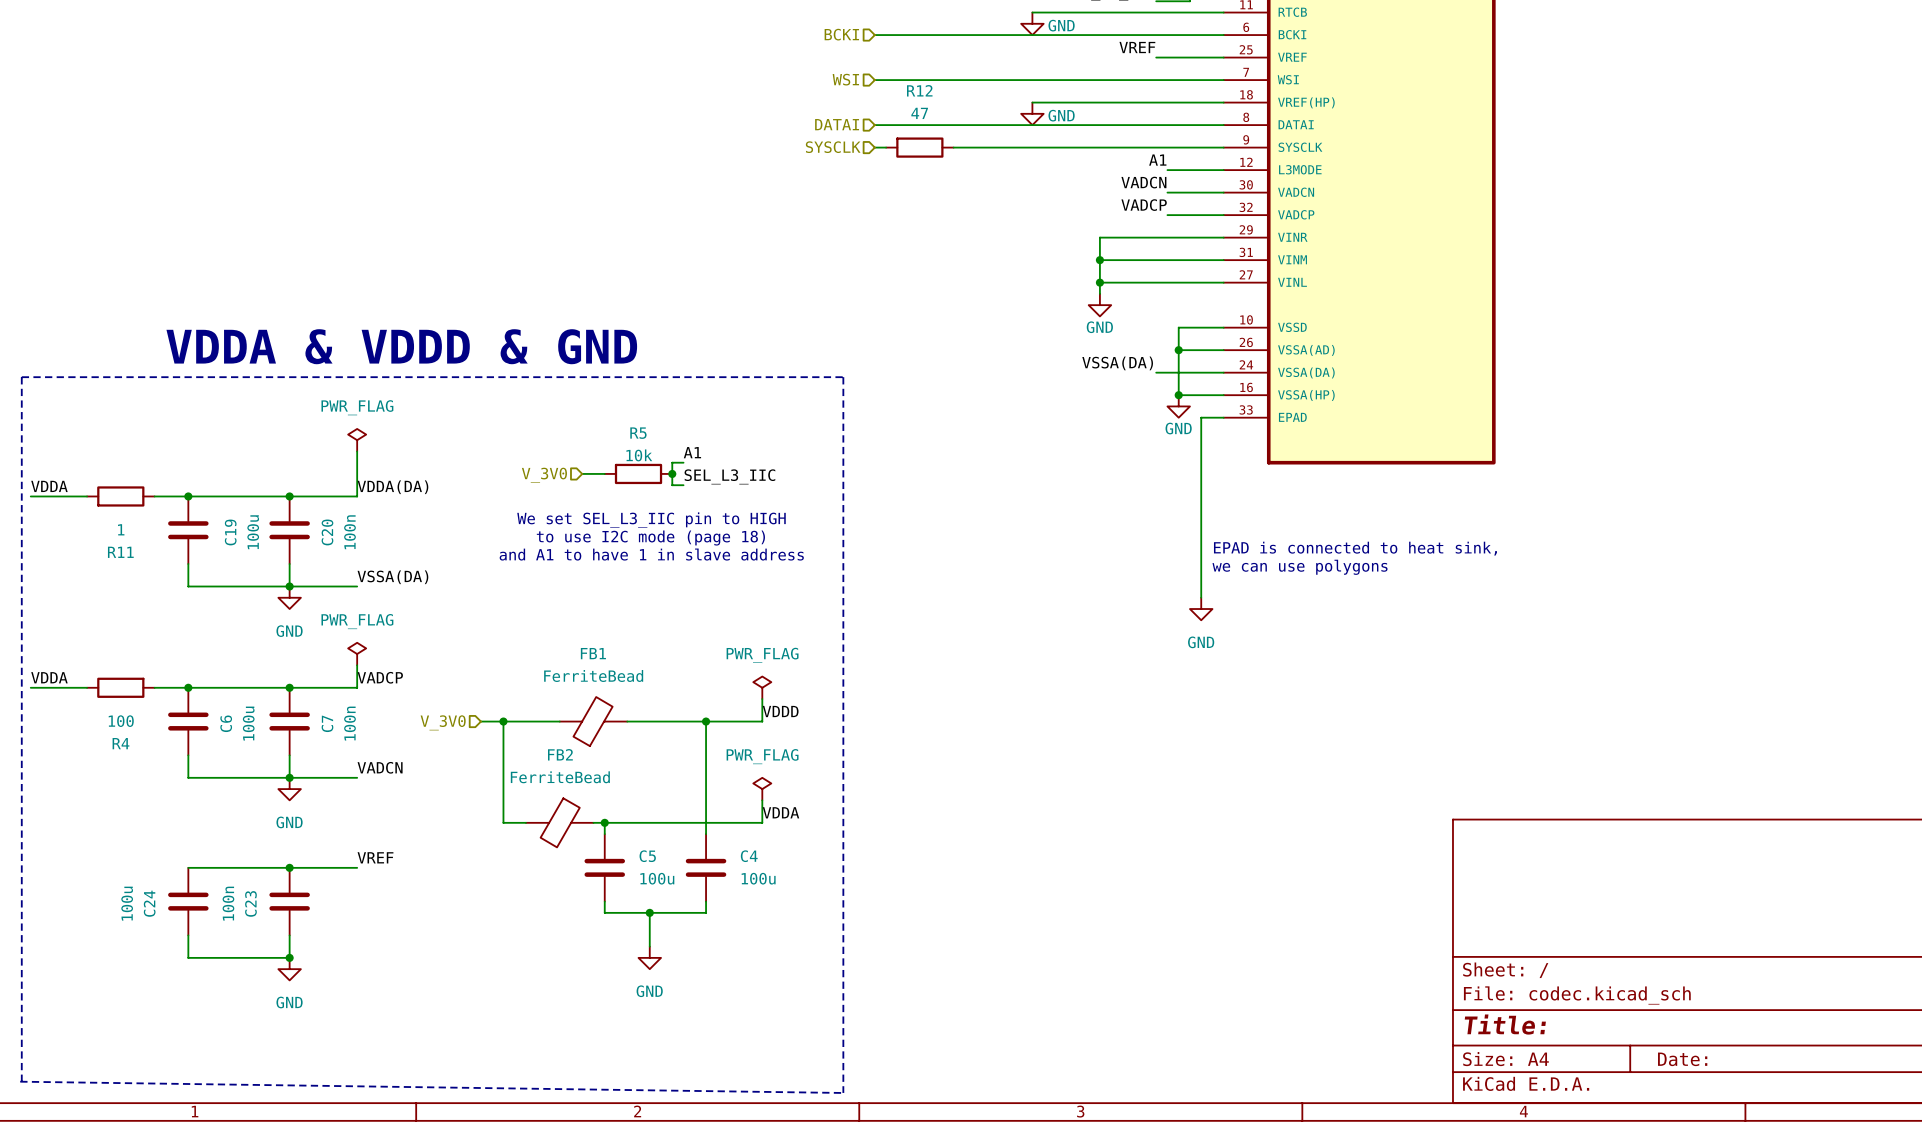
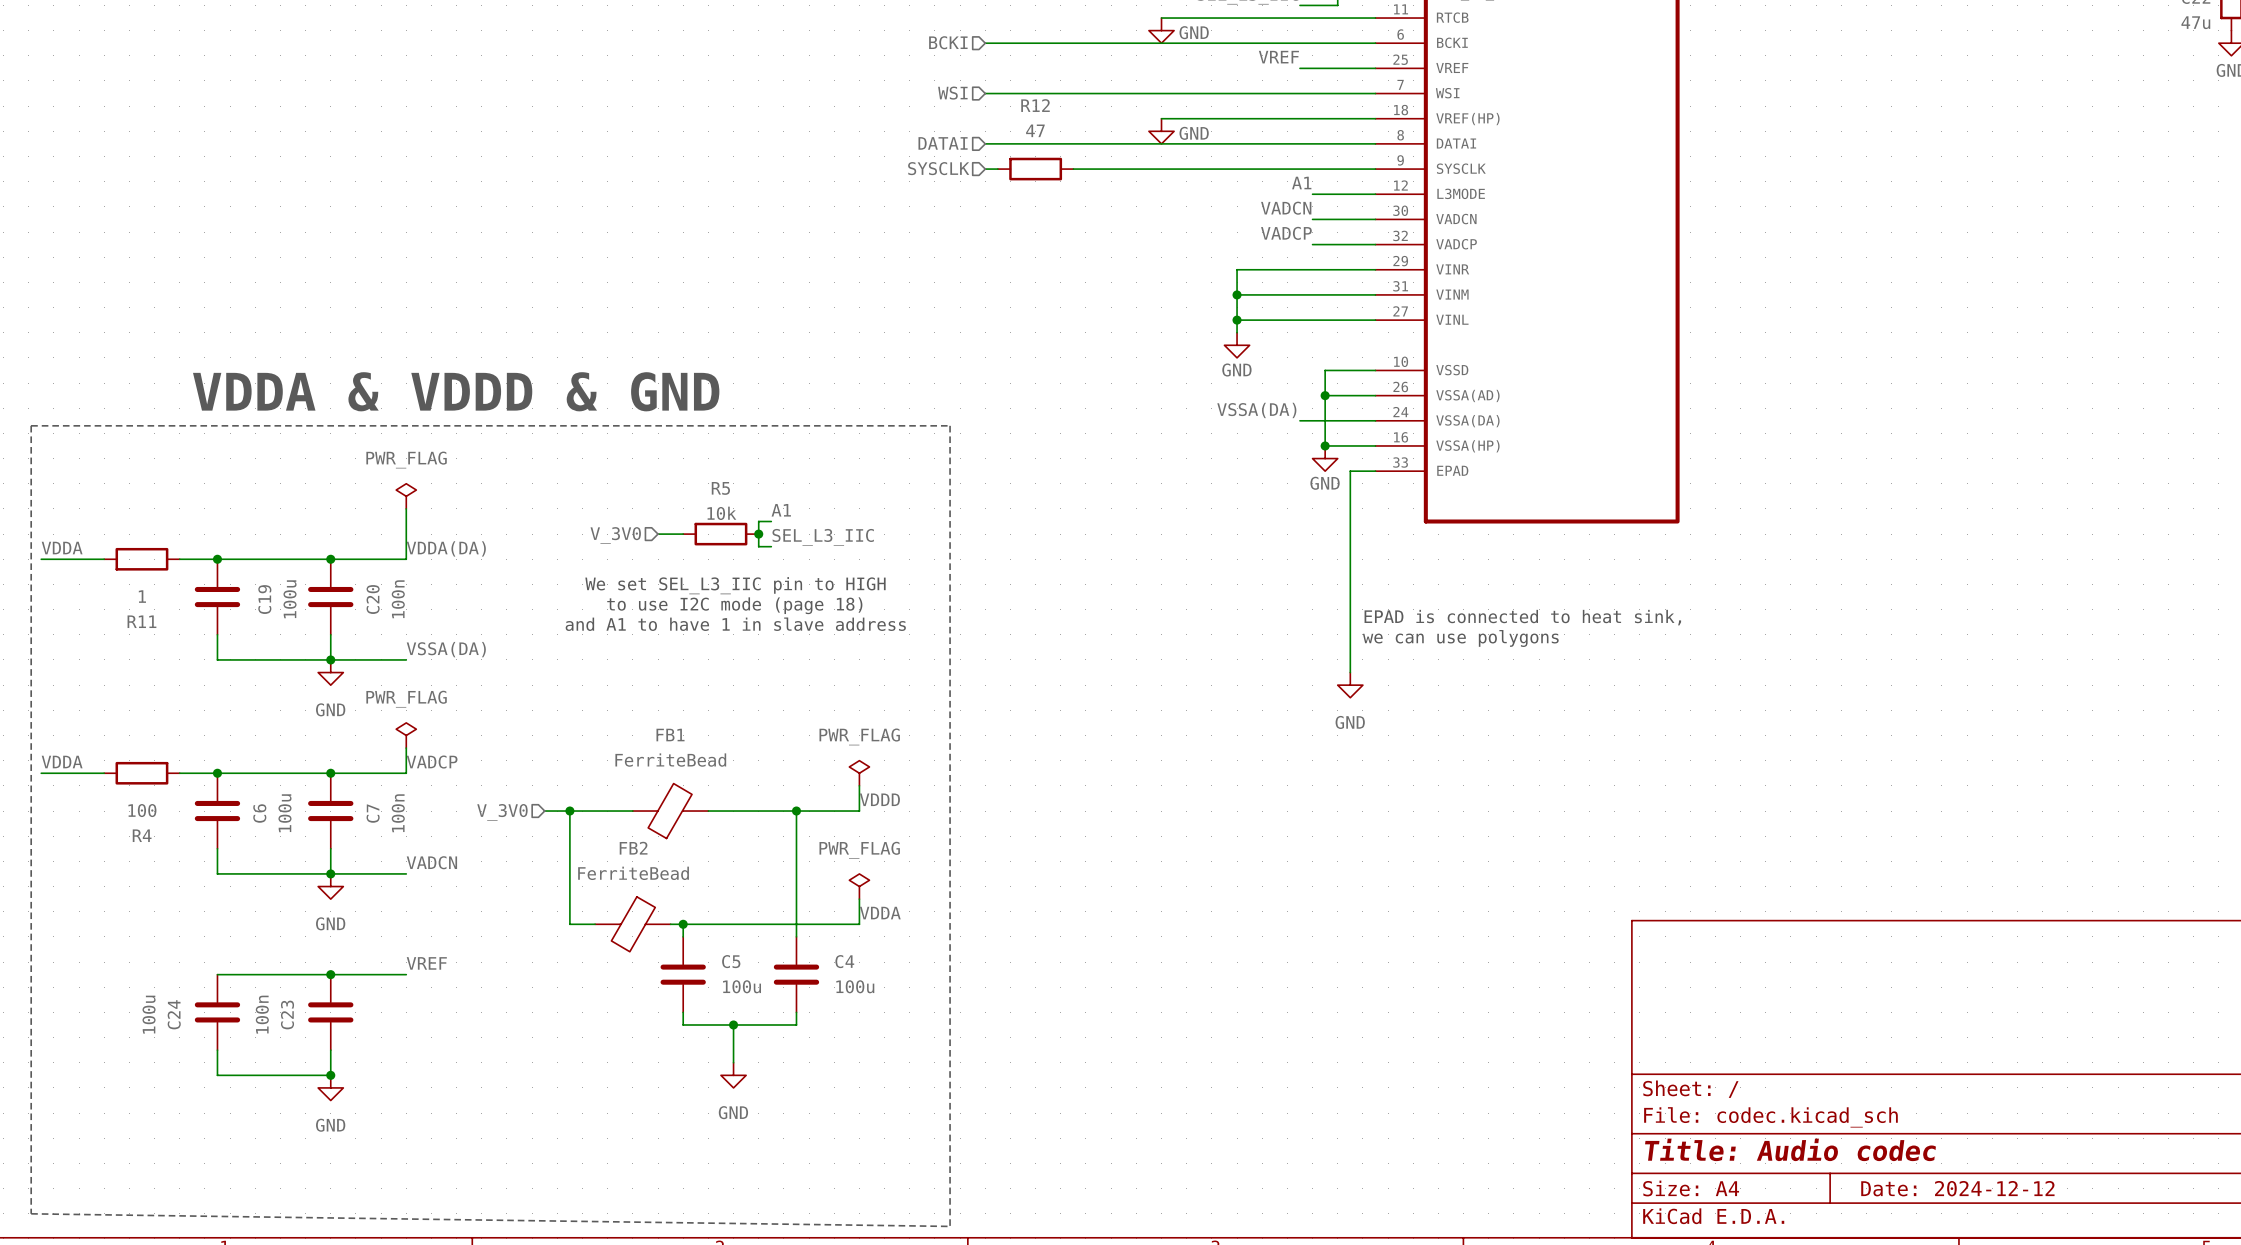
title block: Title: (1505, 1024) -> Title: Audio codec (1790, 1149)
title block: Date: (1682, 1059) -> Date: 2024-12-12 (1957, 1188)

